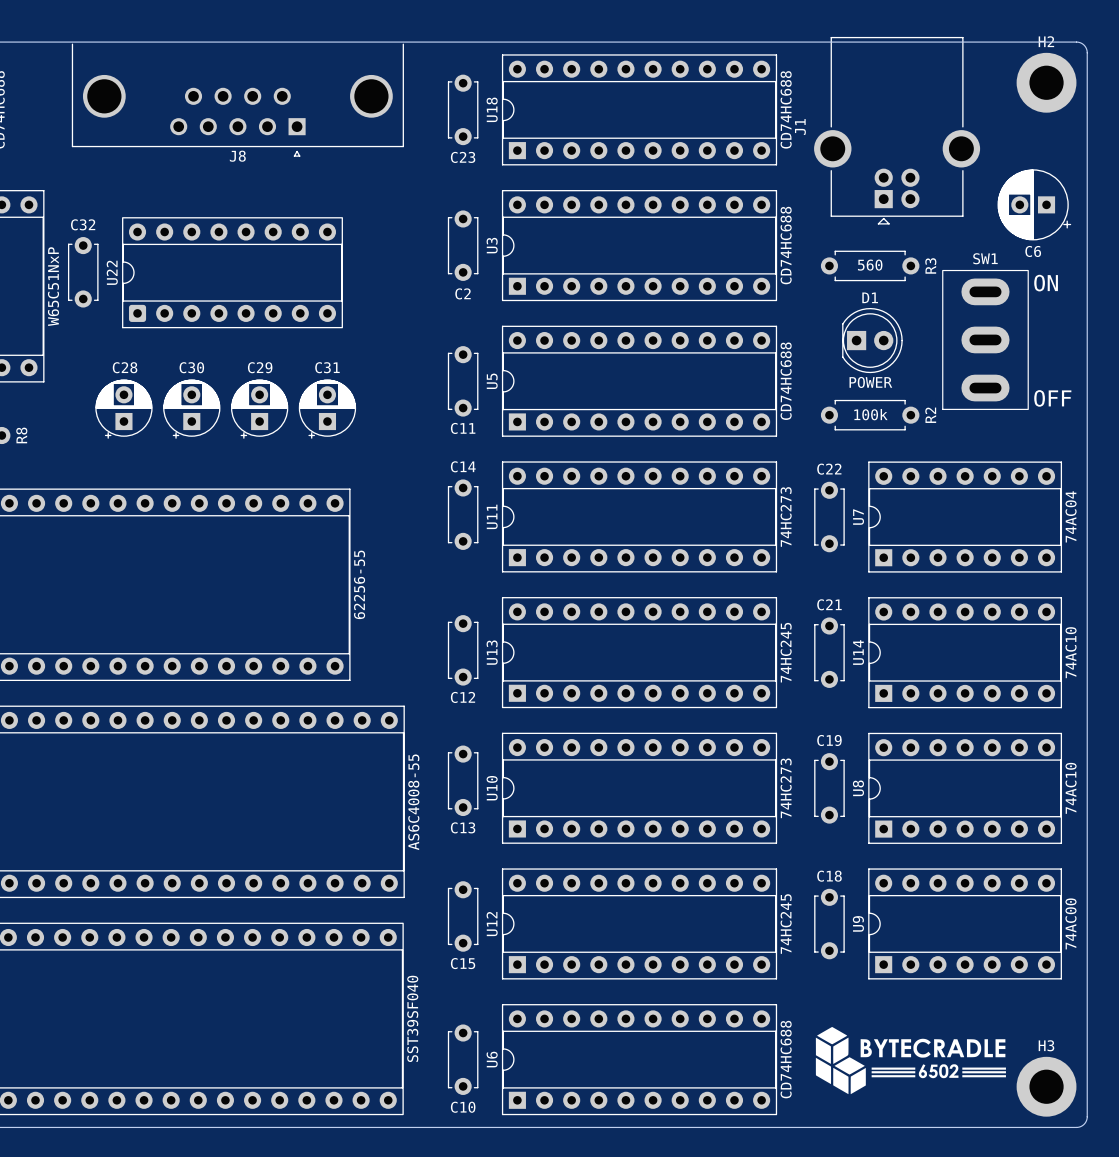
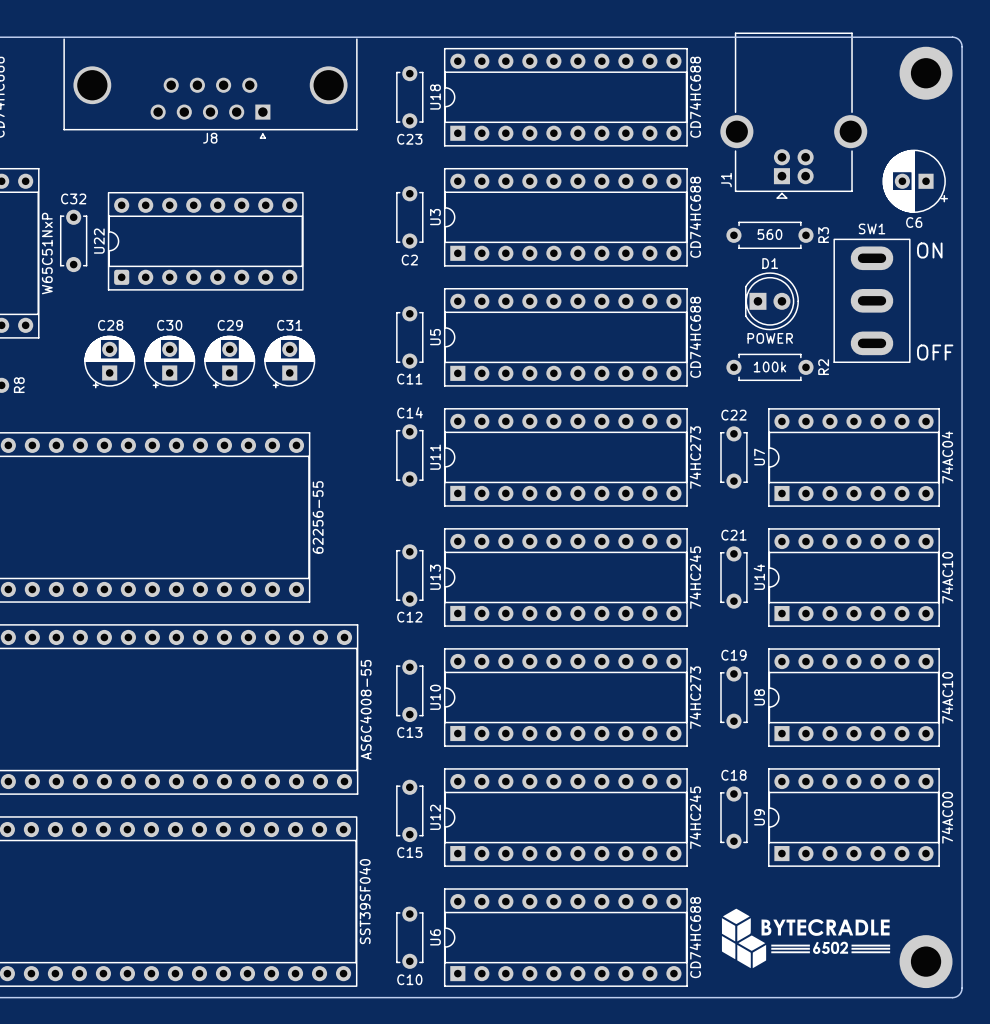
H2 name: H2 (1046, 41) -> none
J1 name position: J1 (800, 126) -> J1 (726, 180)
H3 name: H3 (1046, 1045) -> none

